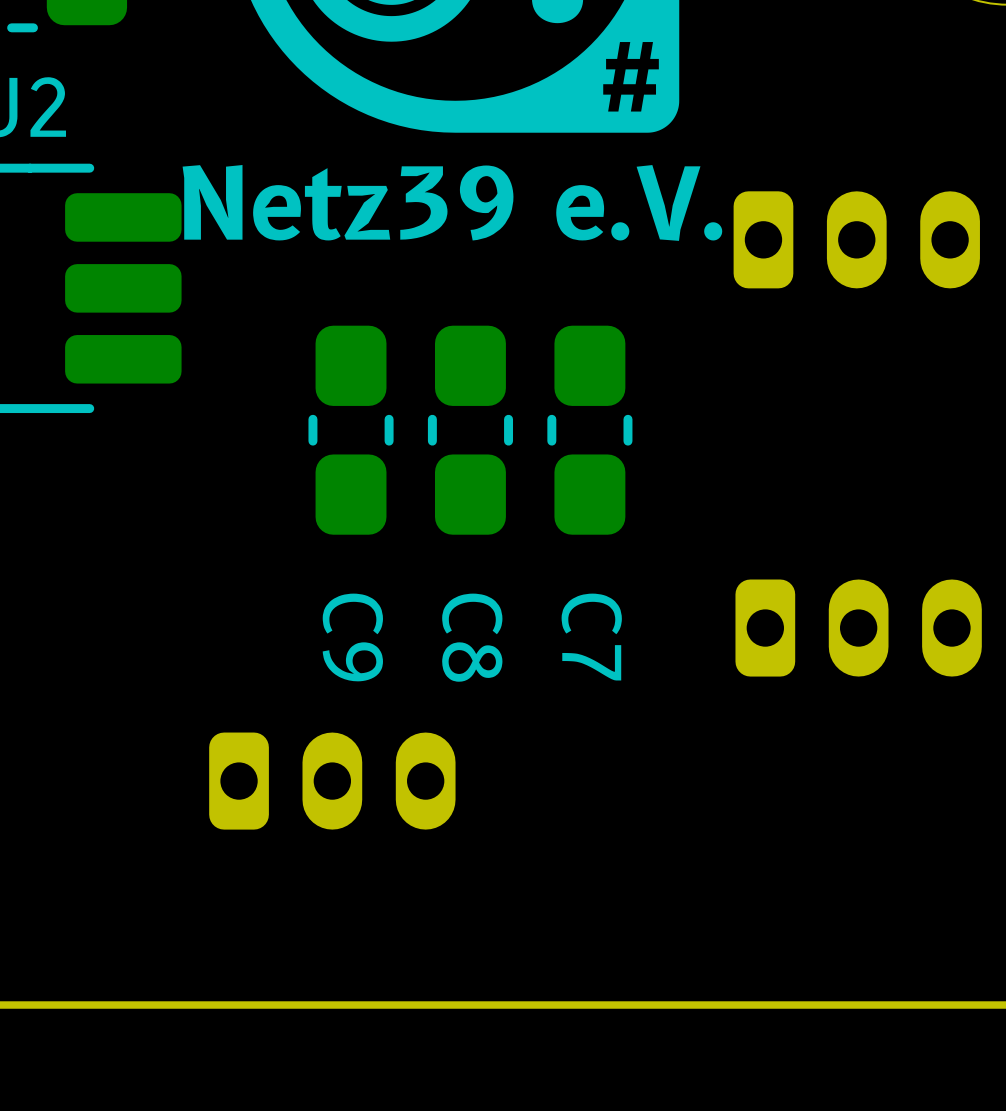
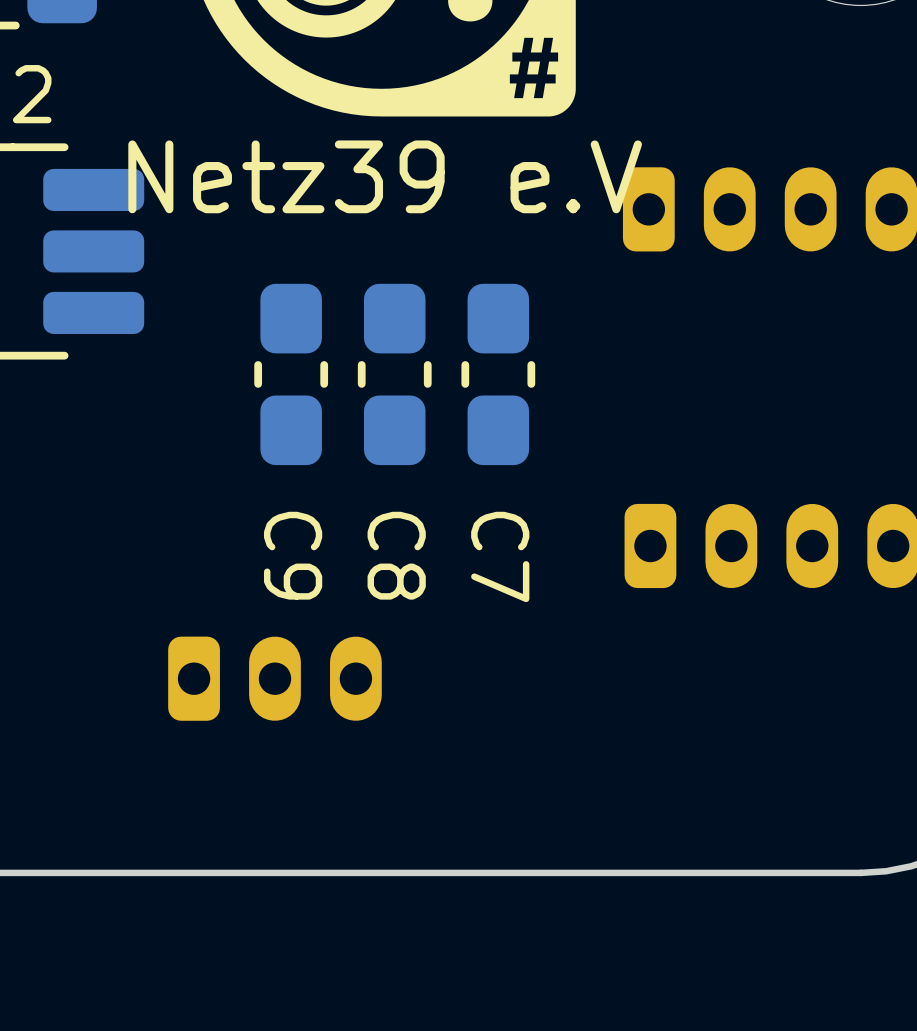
text: Netz39 e.V. (452, 202) -> Netz39 e.V (385, 176)

